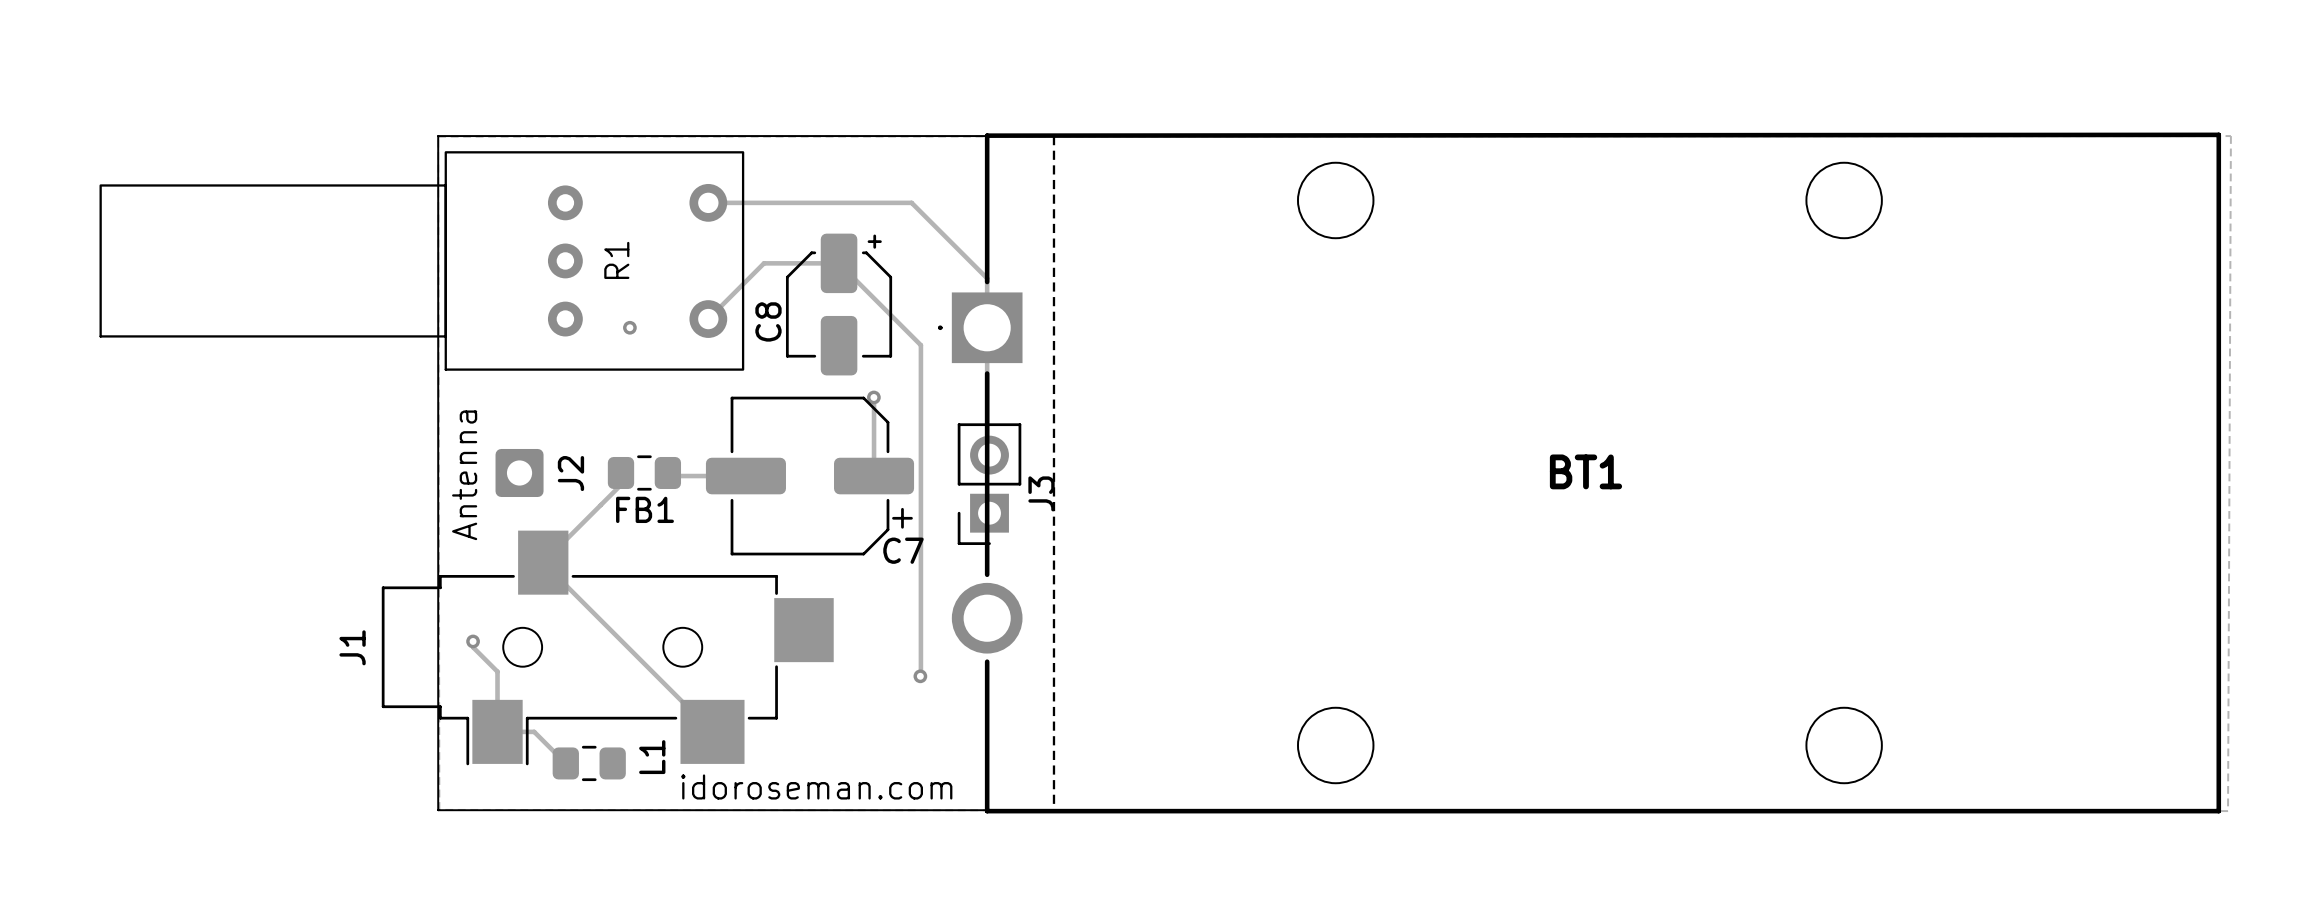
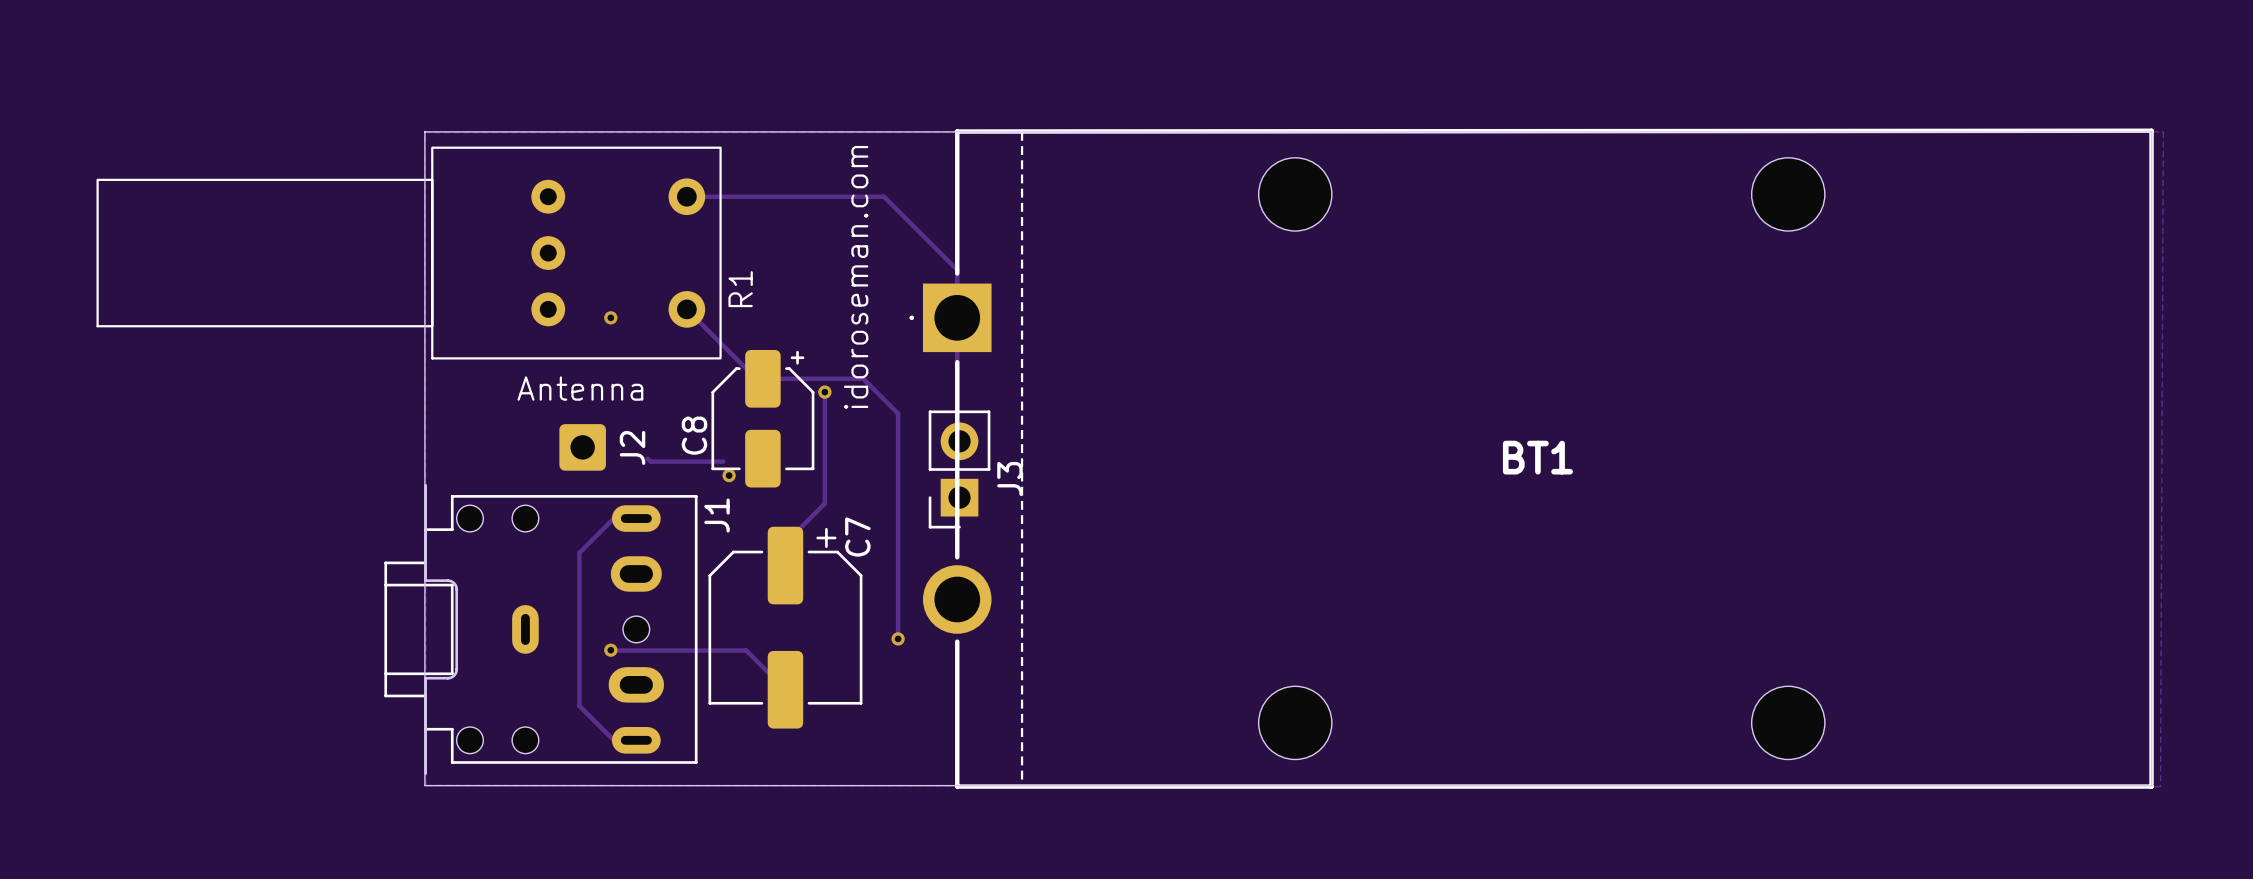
R1 name position: R1 (616, 260) -> R1 (740, 289)
C8 position: (839, 304) -> (762, 418)
track: (710, 316) (764, 263) (839, 263) (920, 345) (920, 676) -> none
track: none -> (686, 309) (756, 378) (863, 378) (898, 413) (898, 638)
C7 footprint: [705, 396, 915, 556] -> [708, 526, 863, 729]
via position: (873, 397) -> (824, 392)
track: (874, 397) (874, 476) -> none
track: none -> (824, 392) (824, 503) (785, 543) (785, 565)
J2 position: (519, 472) -> (582, 447)
track: (620, 472) (620, 484) (543, 562) (712, 731) -> none
FB1: (644, 472) -> none
text rotation: 0° (464, 475) -> 90° clockwise (580, 388)
via: none -> (729, 475)
J1 footprint: [381, 530, 834, 766] -> [384, 483, 698, 775]
track: none -> (613, 518) (579, 552) (579, 705) (613, 740)
C7 name position: C7 (903, 550) -> C7 (857, 536)
track: (473, 641) (473, 647) (497, 671) (497, 731) (534, 731) (565, 763) -> none
via: (473, 641) -> none
J1 name position: J1 (352, 647) -> J1 (717, 515)
via: none -> (610, 650)
track: none -> (611, 650) (746, 650) (785, 689)
via position: (920, 676) -> (898, 638)
L1: (589, 763) -> none
text rotation: 0° (816, 786) -> 90° counterclockwise (856, 277)
text position: idoroseman.com (816, 786) -> idoroseman.com (856, 277)

